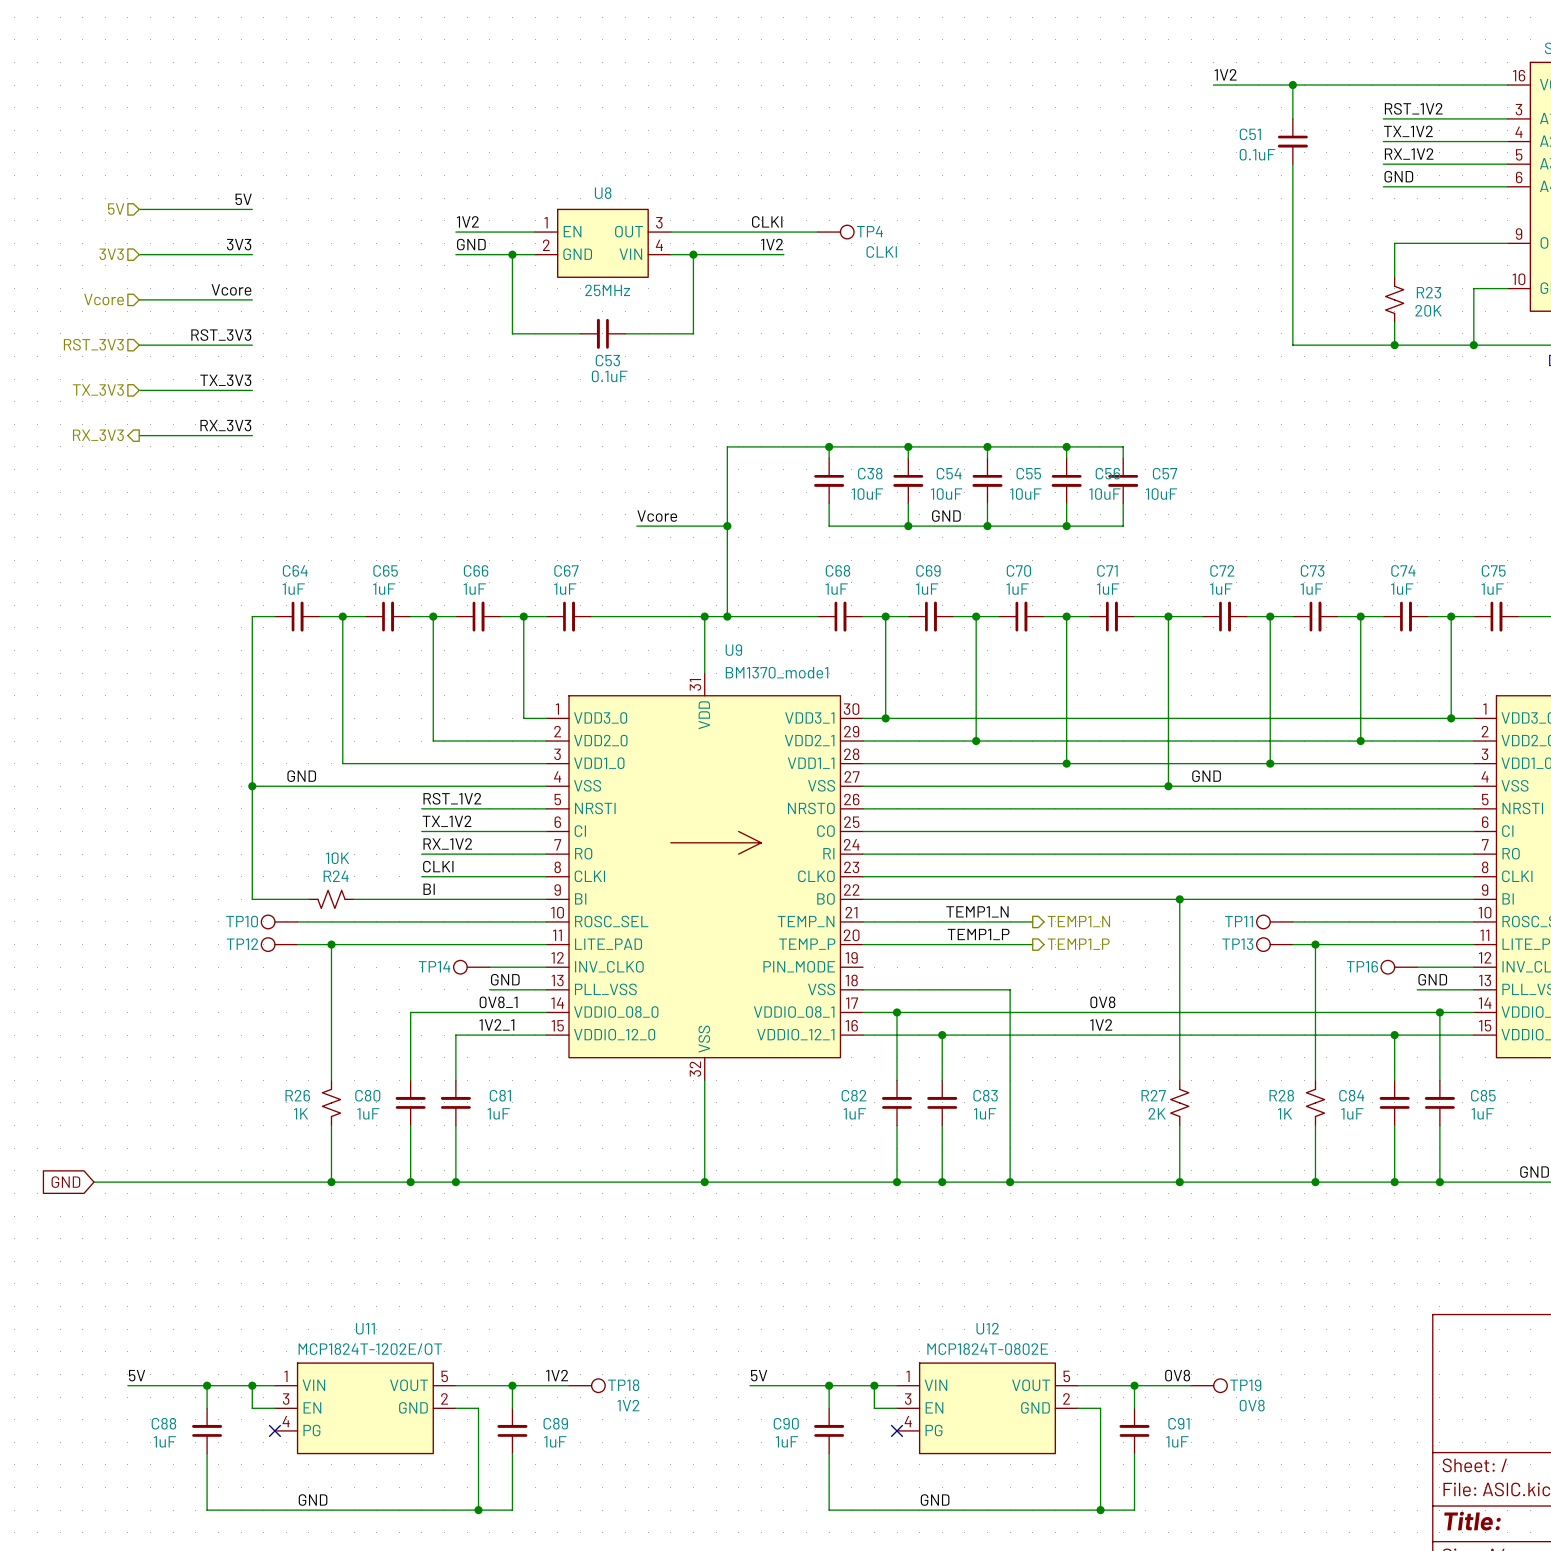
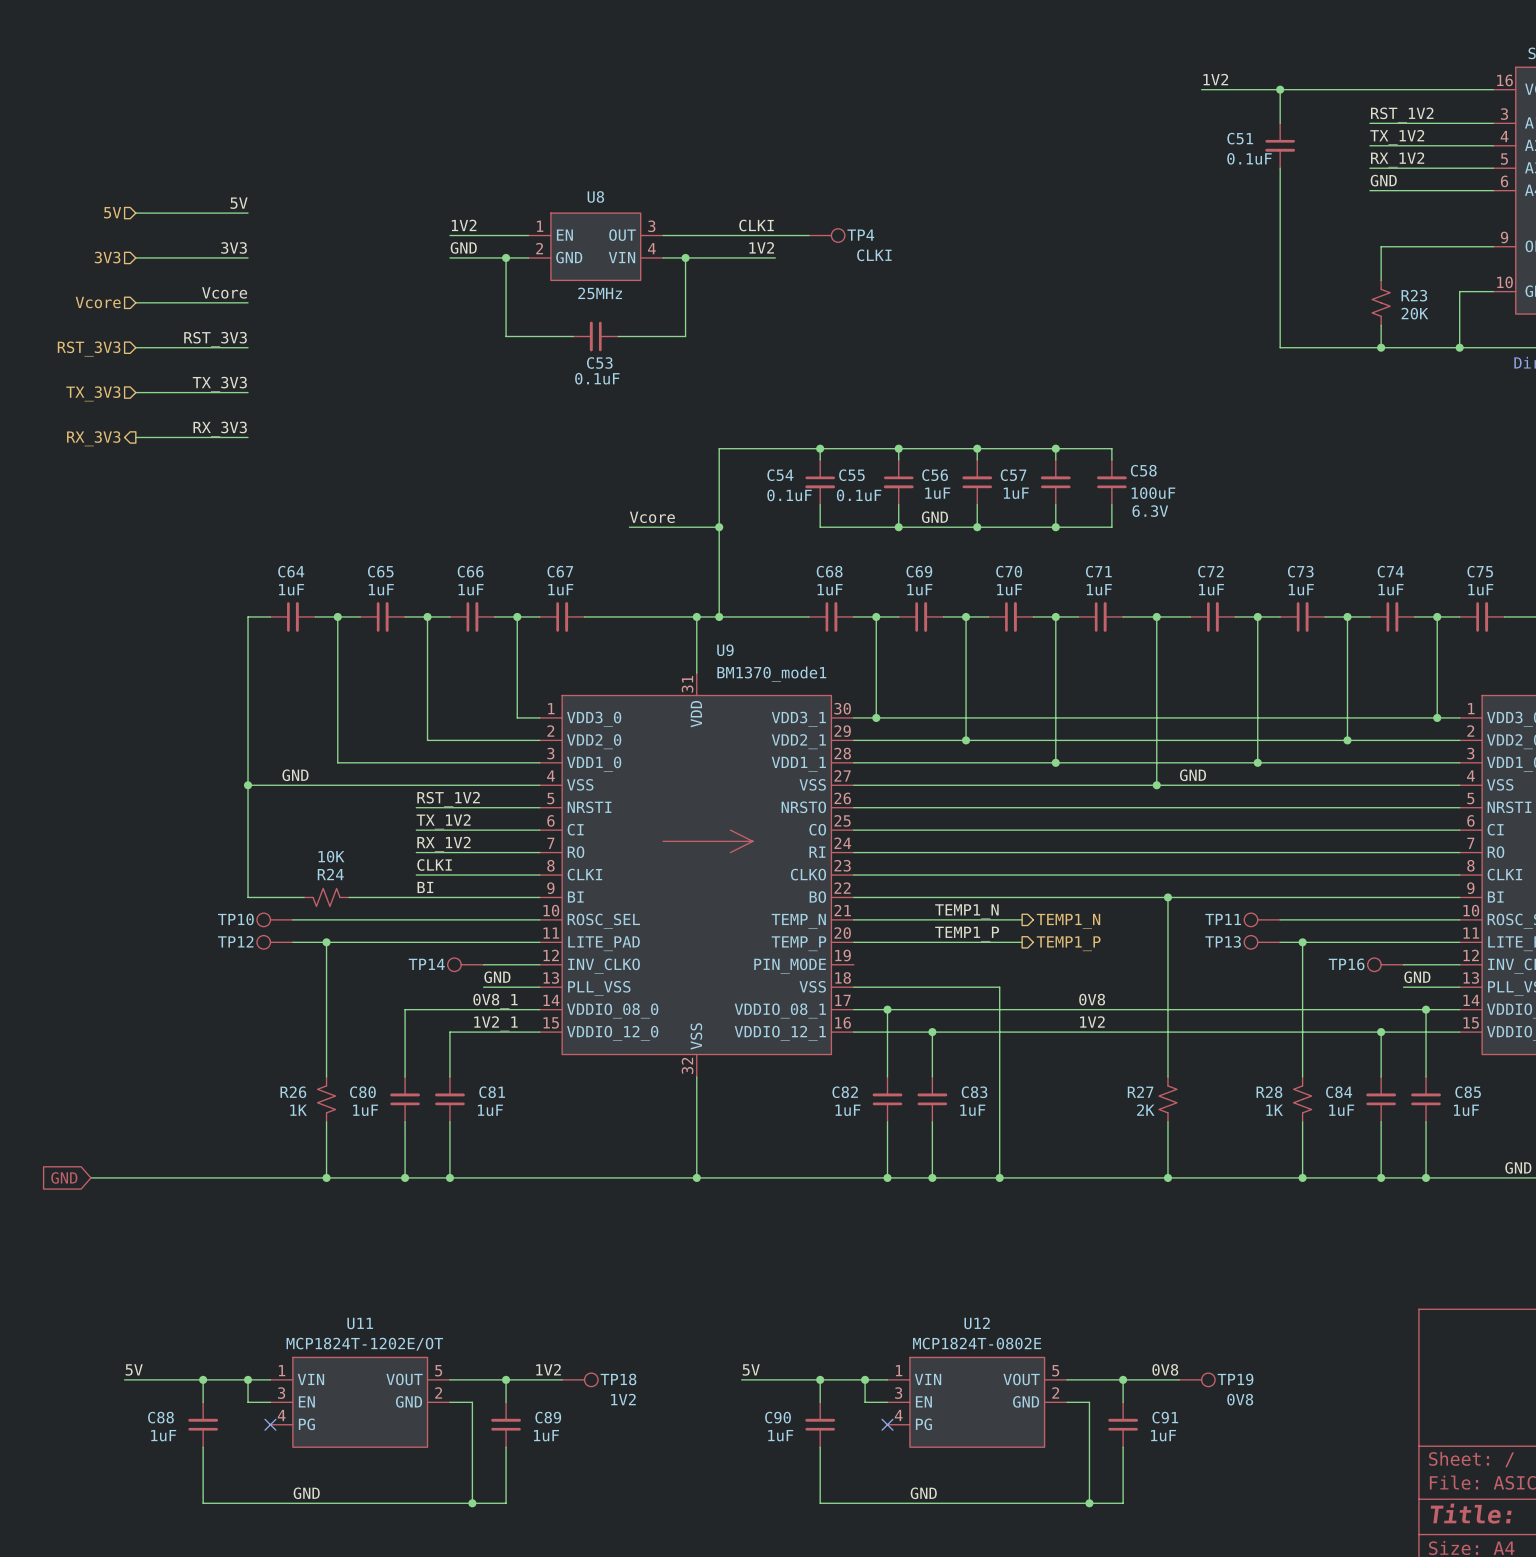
C38 name: C38 (870, 473) -> C54 (780, 475)
C54 name: C54 (949, 473) -> C55 (851, 475)
C55: 10uF (987, 480) -> none
C56 rotation: 0° (1066, 480) -> 180° (977, 482)
C56 position: (1066, 480) -> (977, 482)
C57 rotation: 0° (1123, 480) -> 180° (1055, 482)
C57 position: (1123, 480) -> (1055, 482)
C58: none -> 100uF (1111, 482)
C38 value: 10uF (867, 494) -> 0.1uF (789, 495)
C54 value: 10uF (946, 494) -> 0.1uF (859, 495)
C56 value: 10uF (1104, 494) -> 1uF (937, 493)
C57 value: 10uF (1161, 494) -> 1uF (1016, 493)

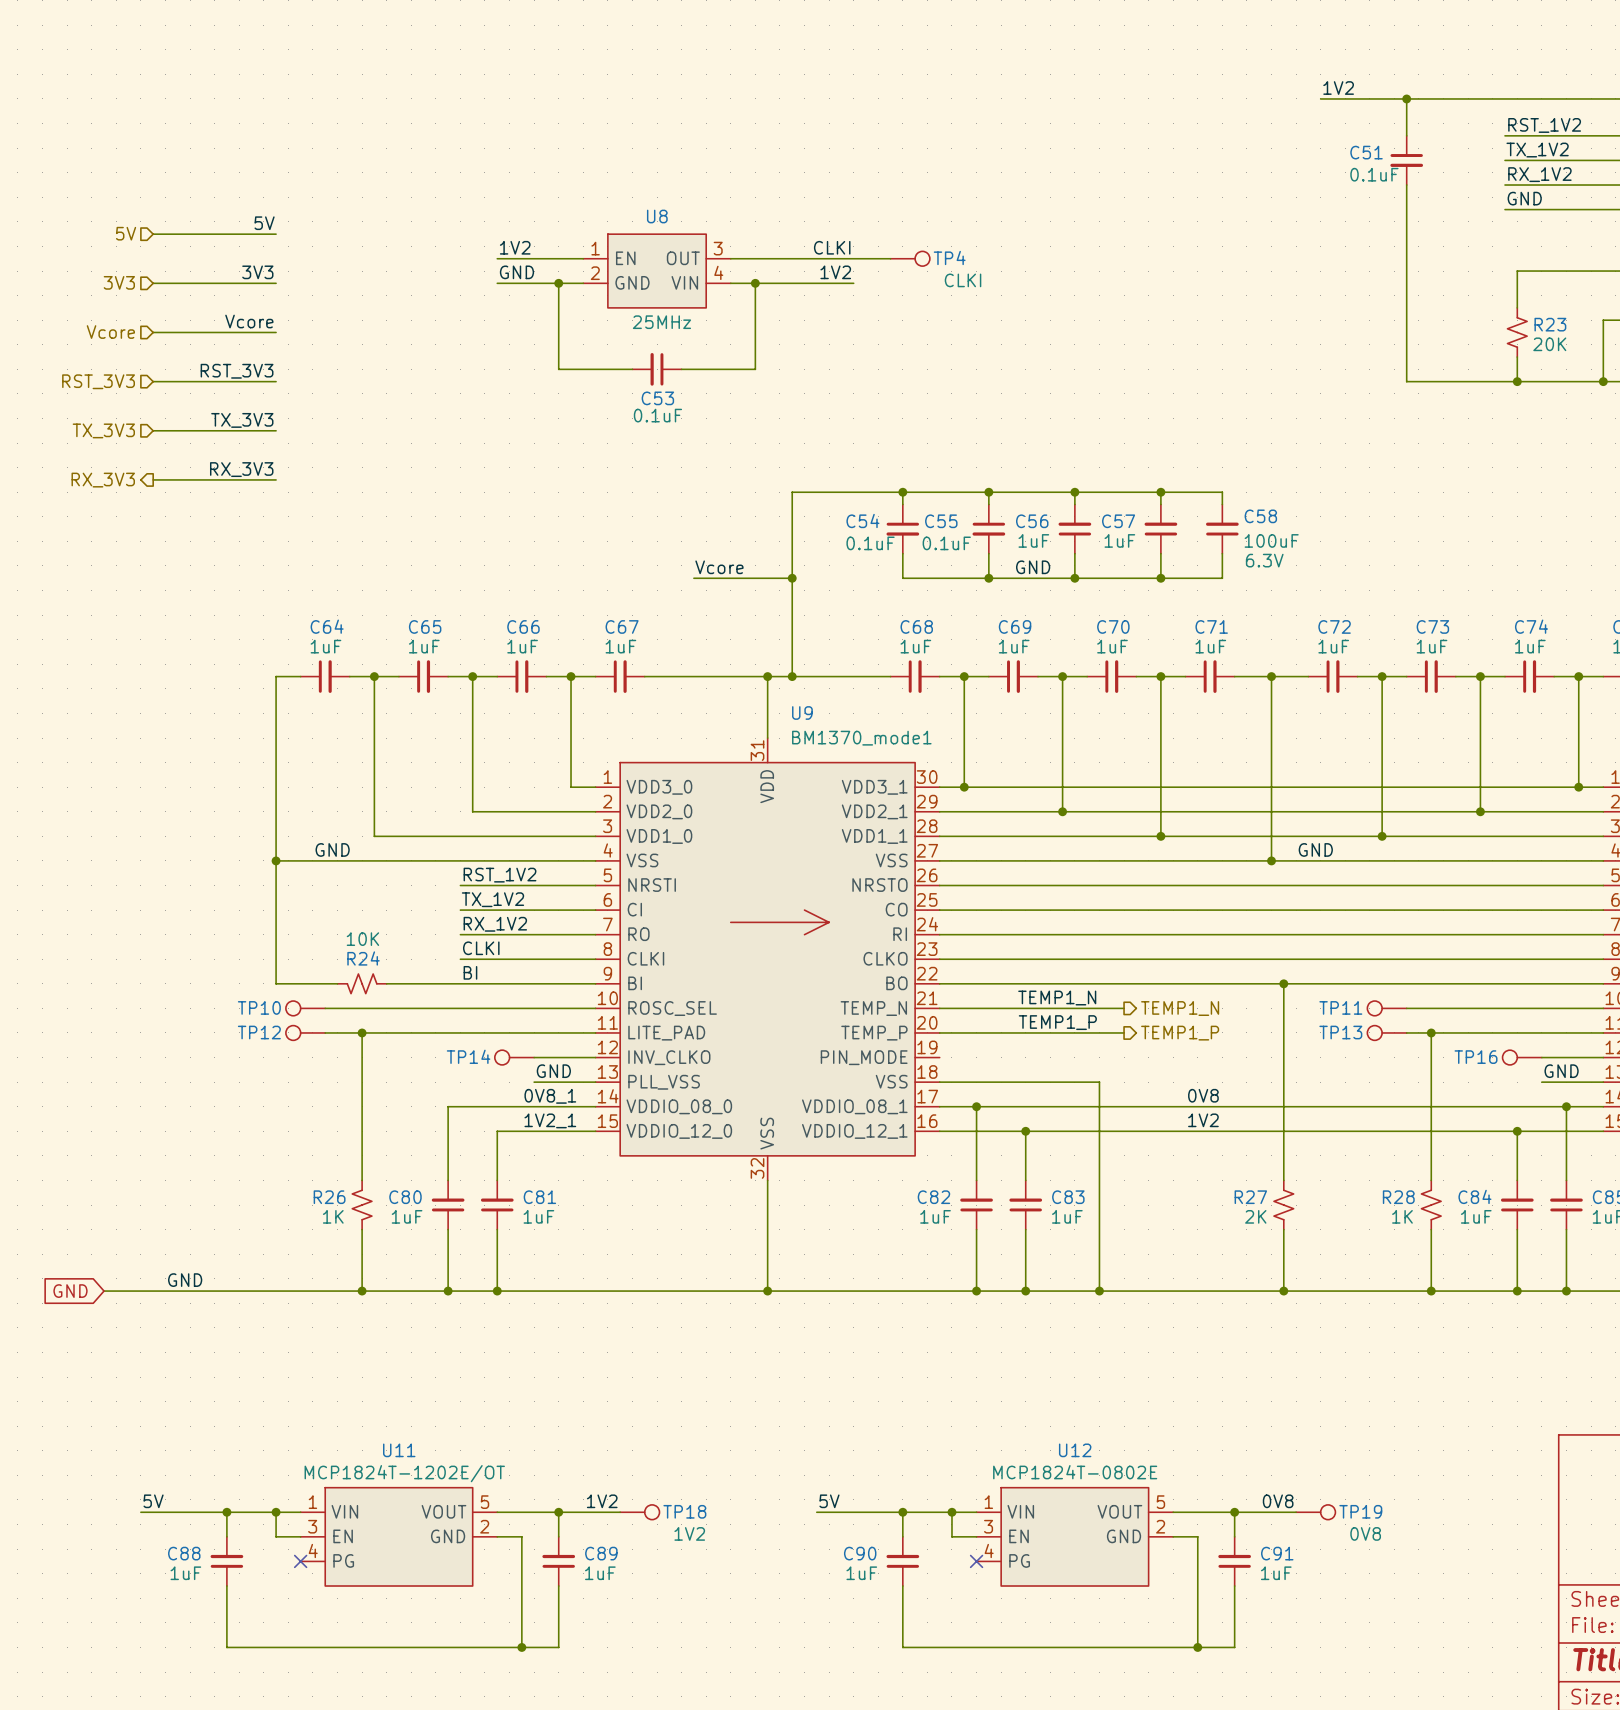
label: none -> GND (185, 1280)
label: GND (306, 1493) -> none
label: GND (923, 1493) -> none

